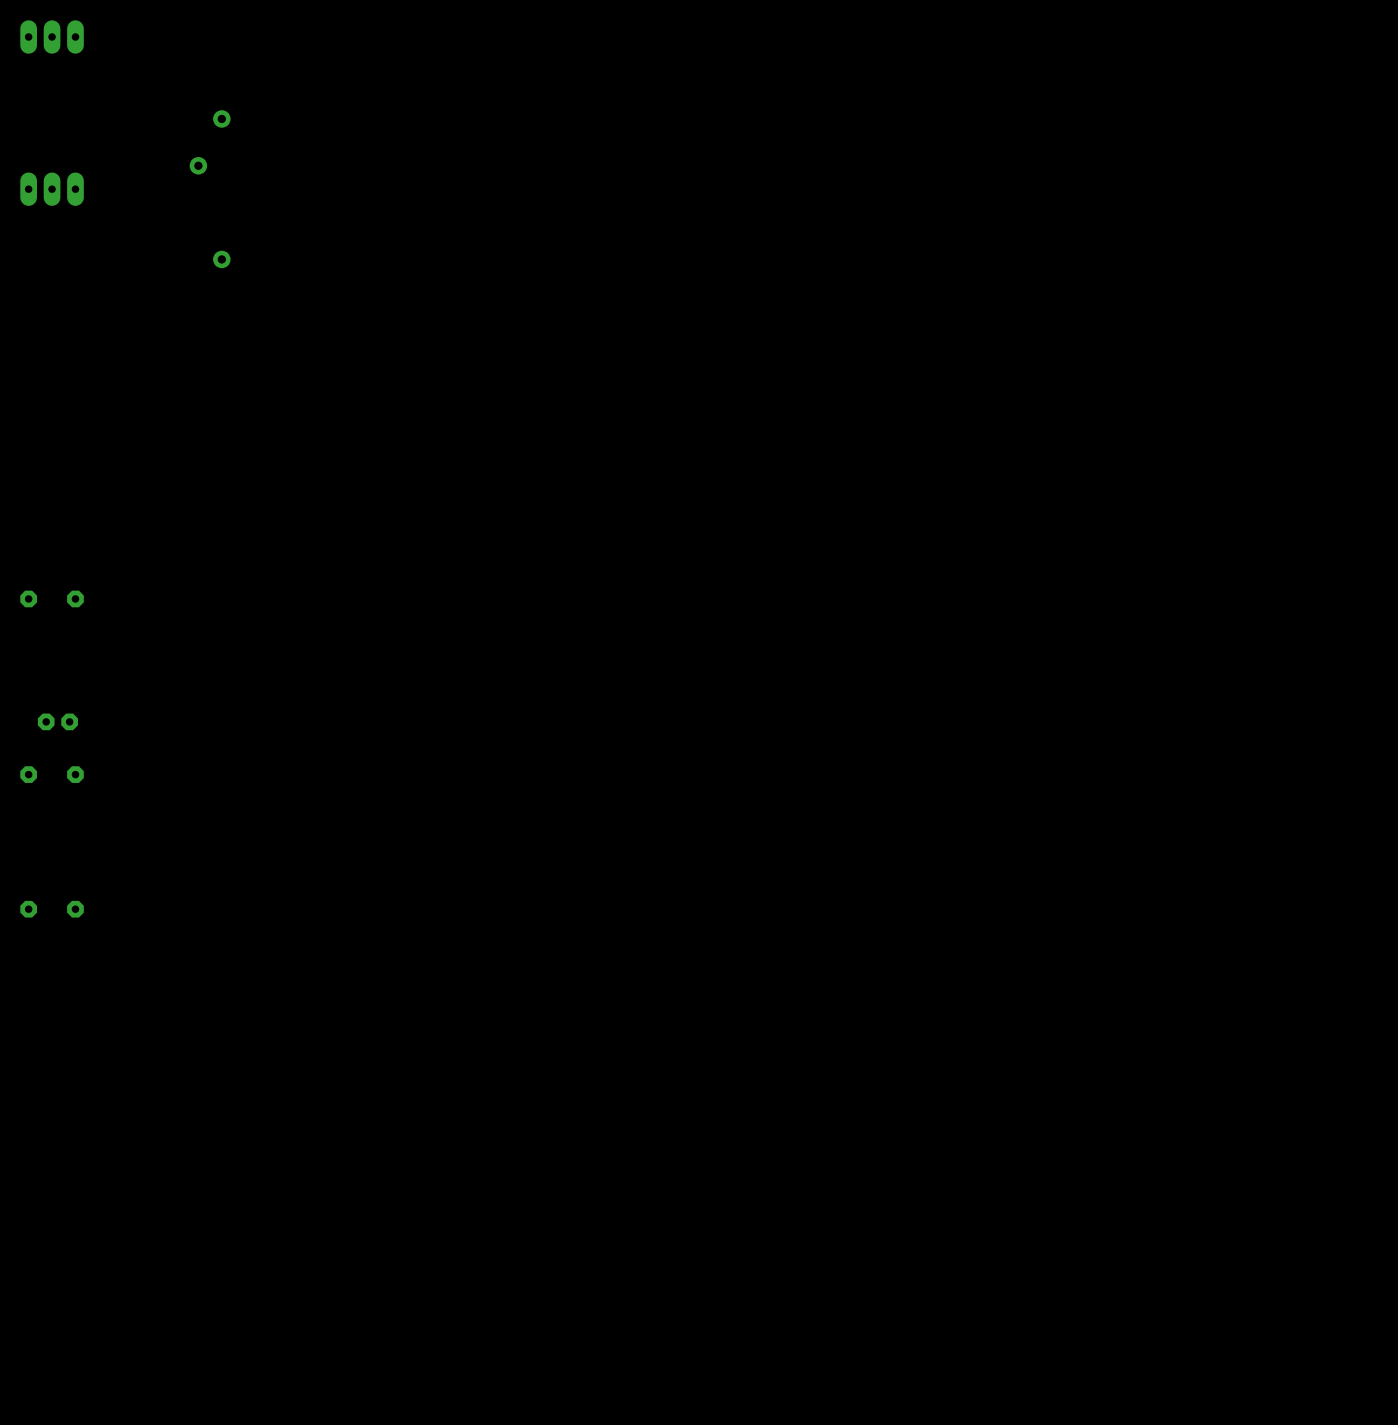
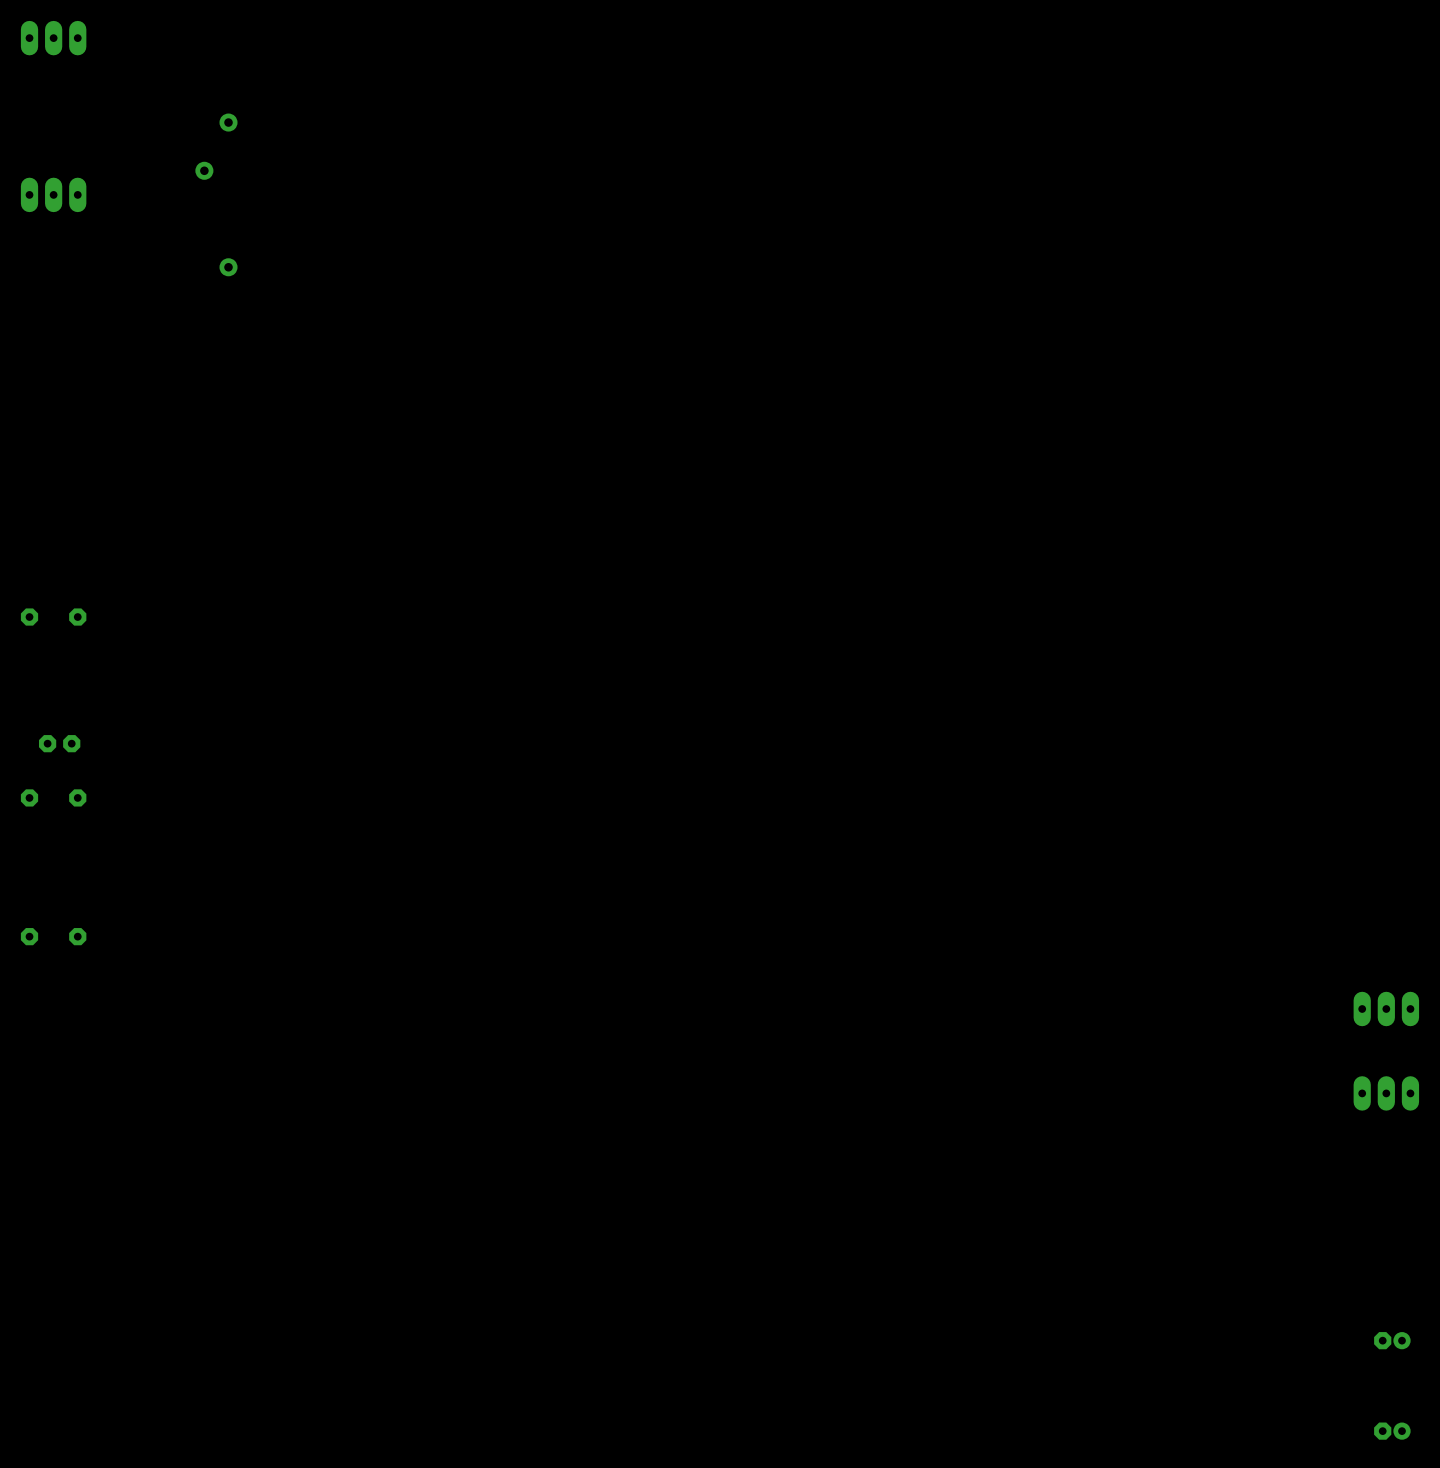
part: none -> (1386, 1009)
part: none -> (1386, 1093)
part: none -> (1392, 1340)
part: none -> (1392, 1431)

